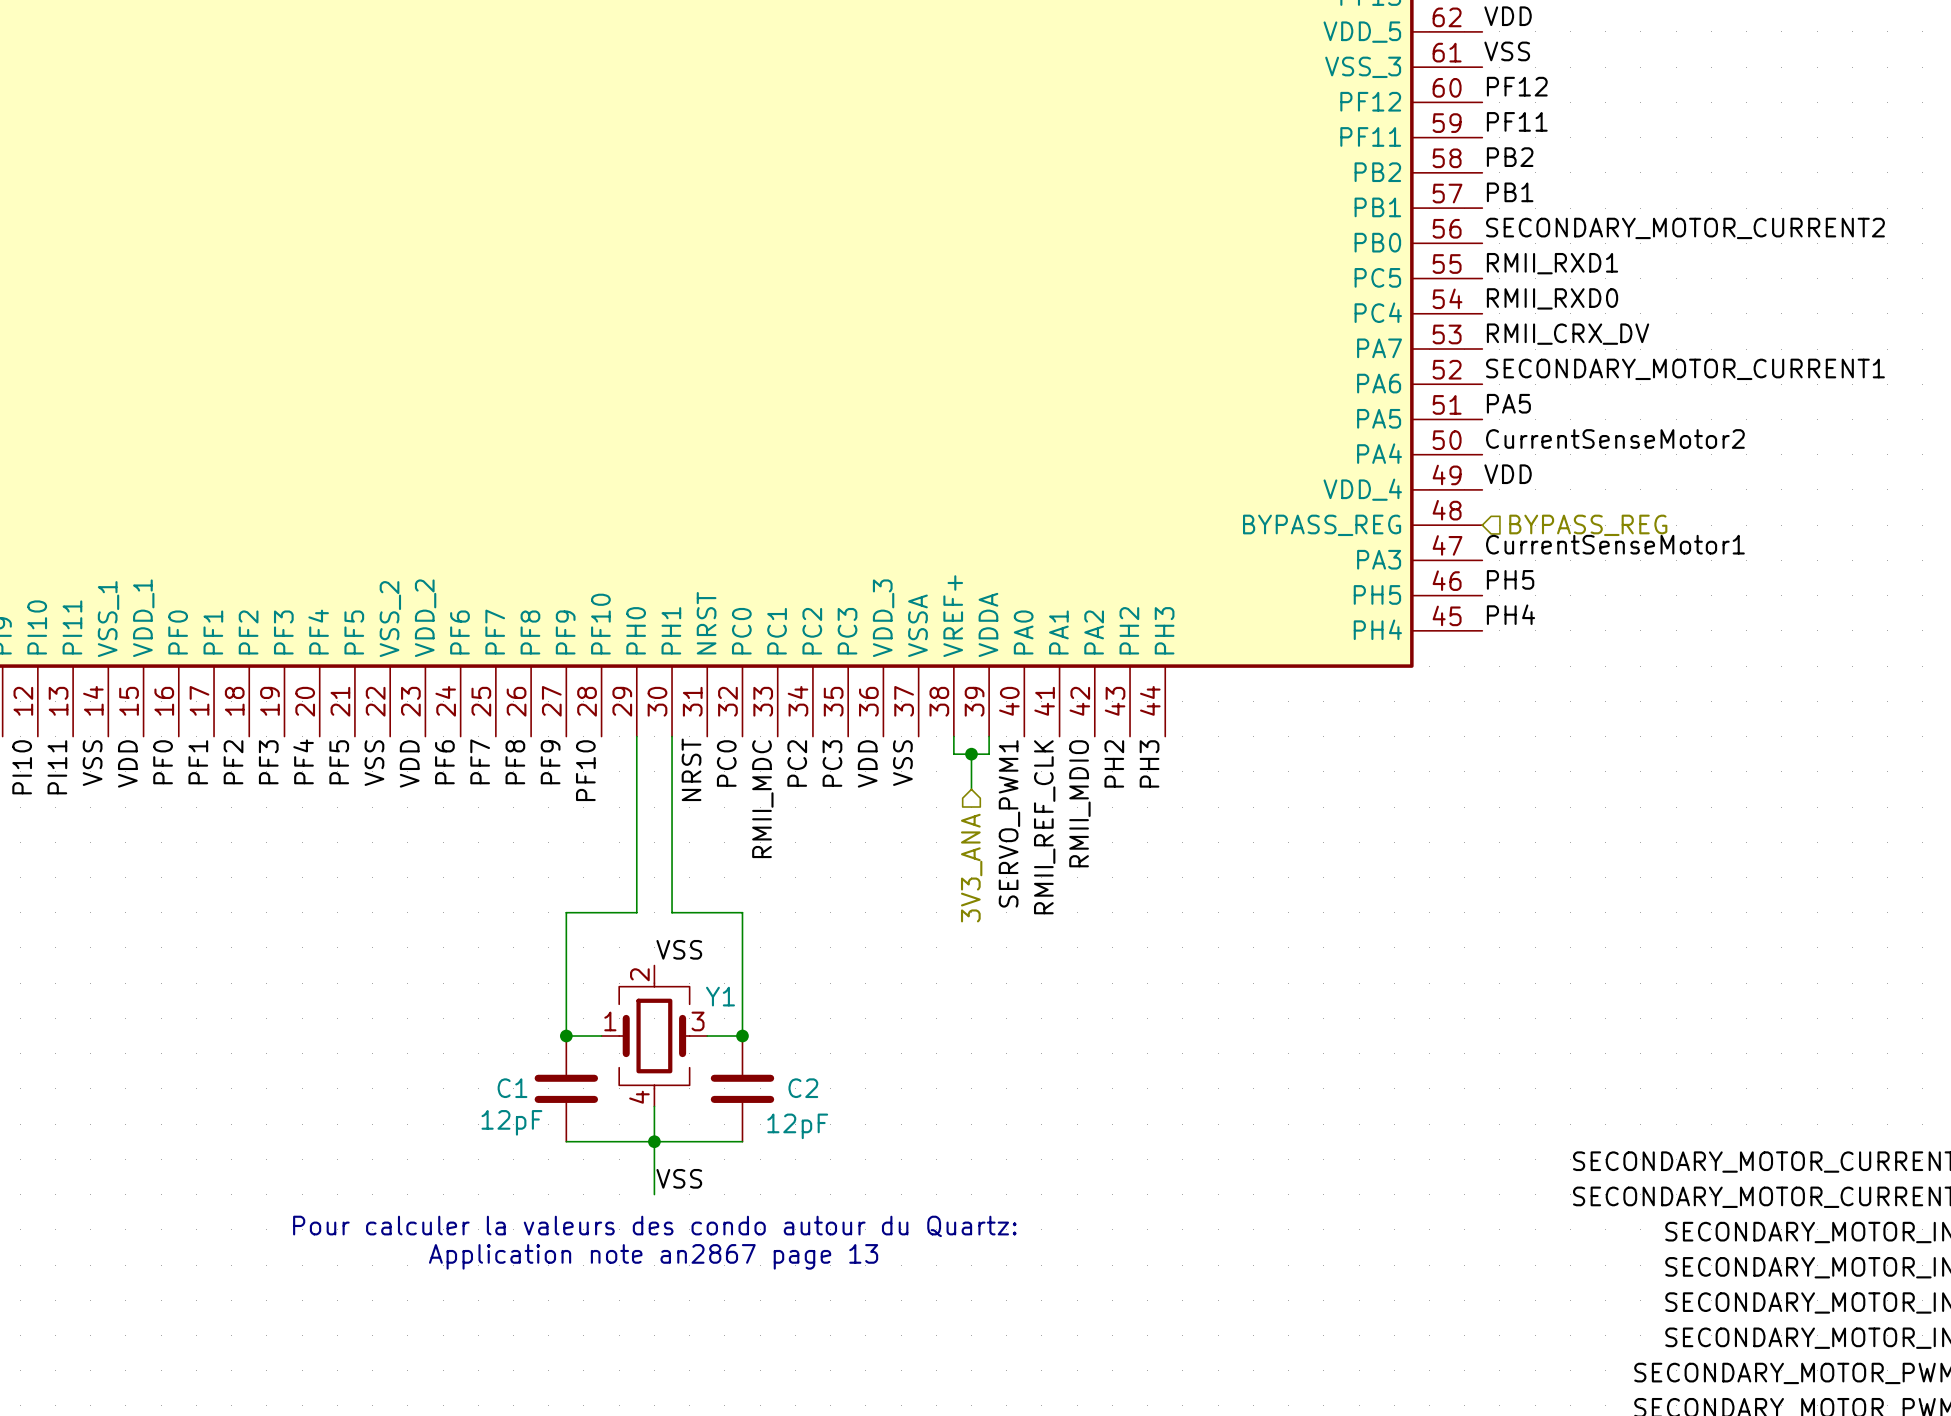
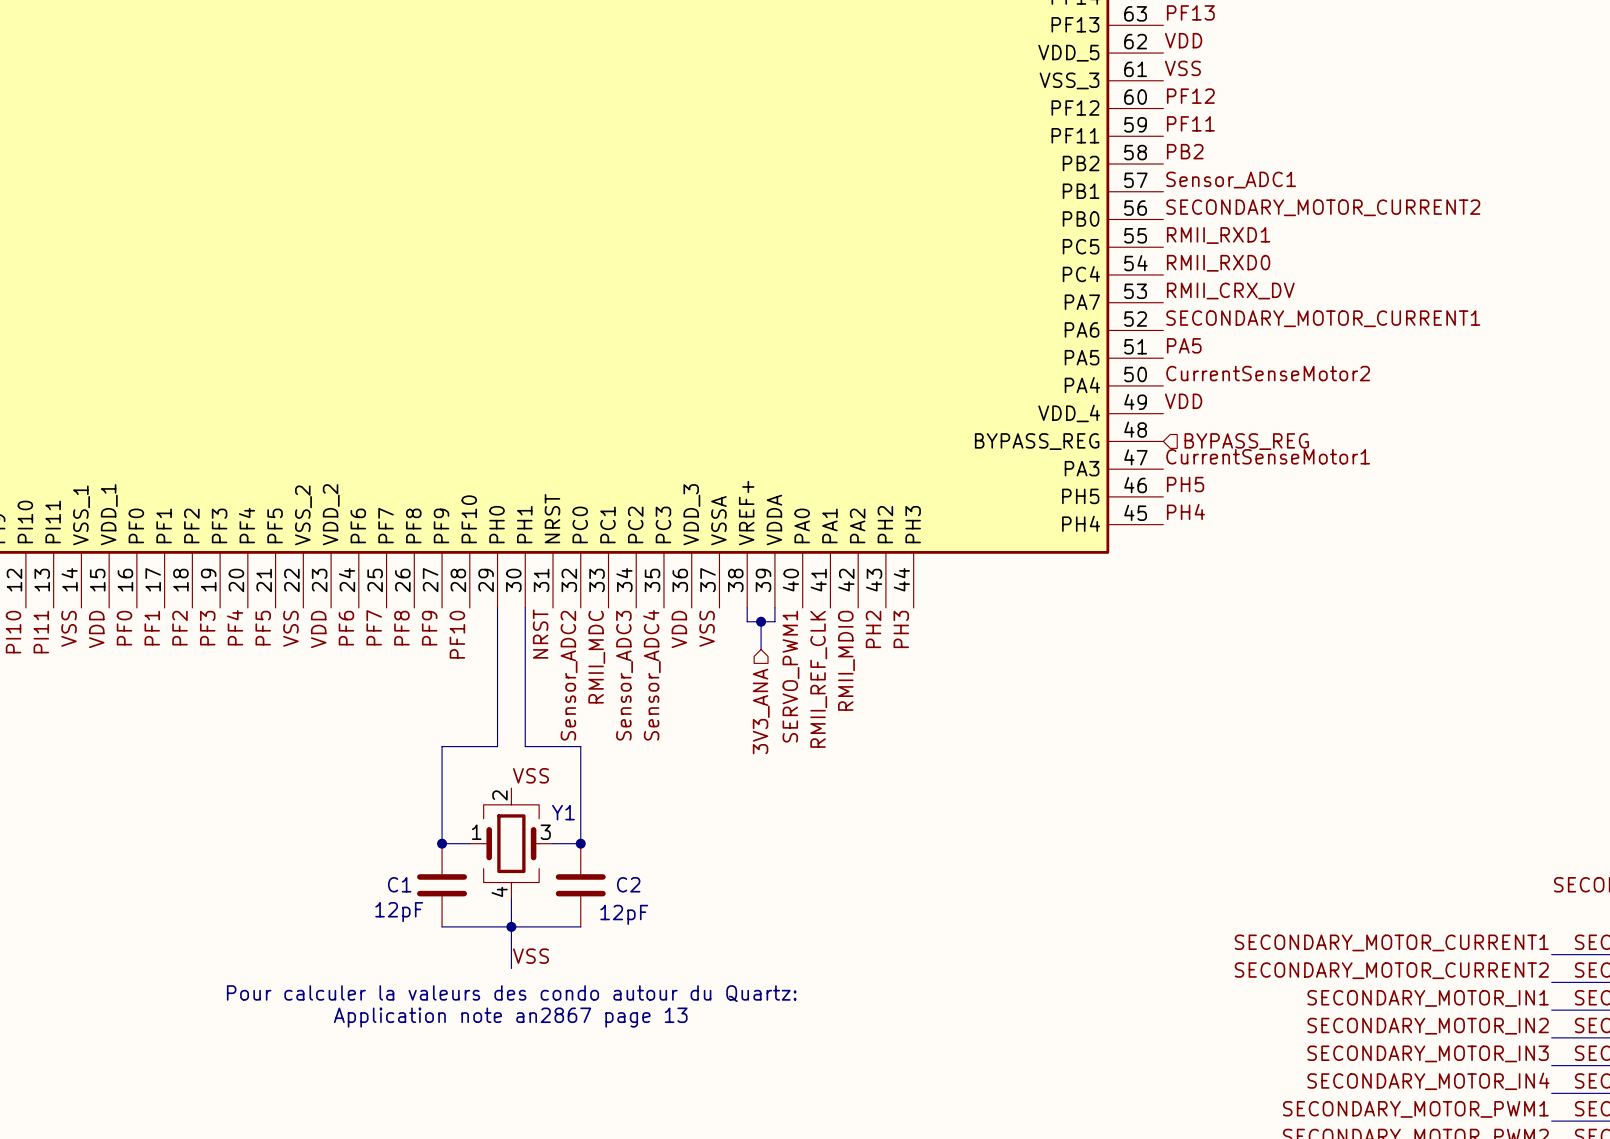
label: PB1 (1510, 192) -> Sensor_ADC1 (1231, 180)
label: PC0 (726, 763) -> Sensor_ADC2 (569, 675)
label: PC2 (797, 763) -> Sensor_ADC3 (624, 675)
label: PC3 (832, 763) -> Sensor_ADC4 (651, 675)

